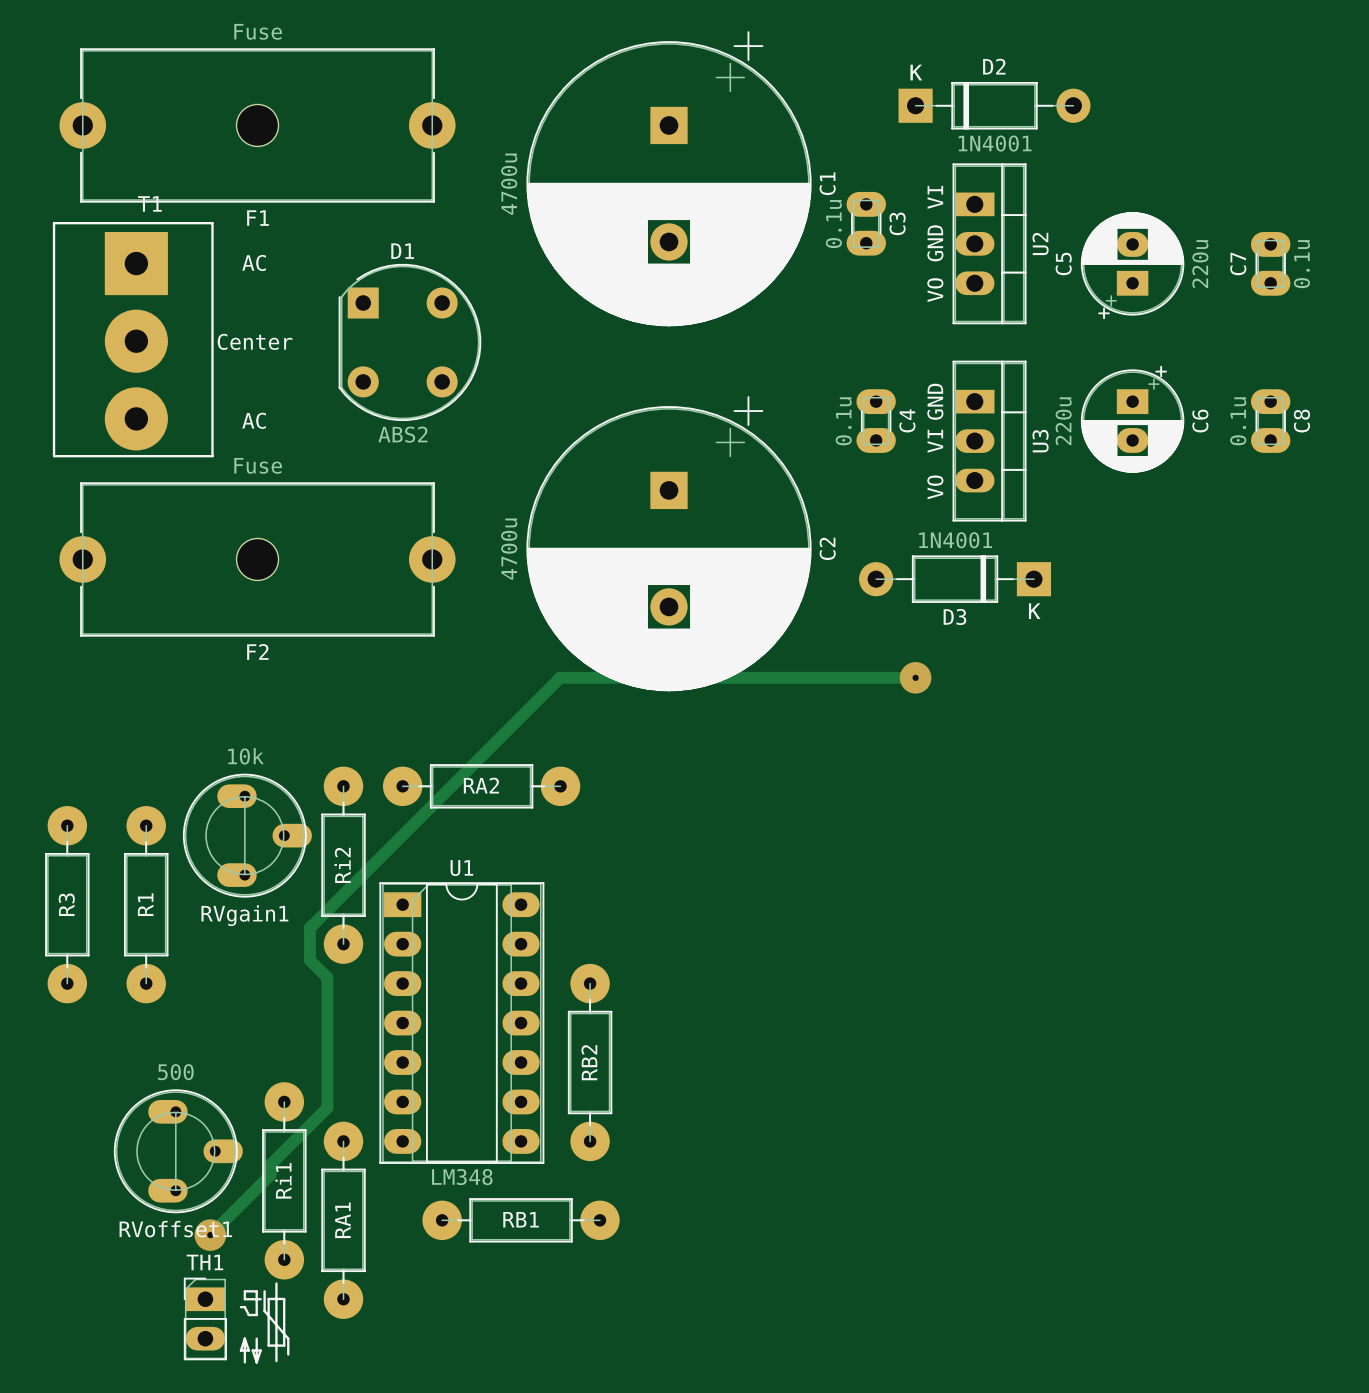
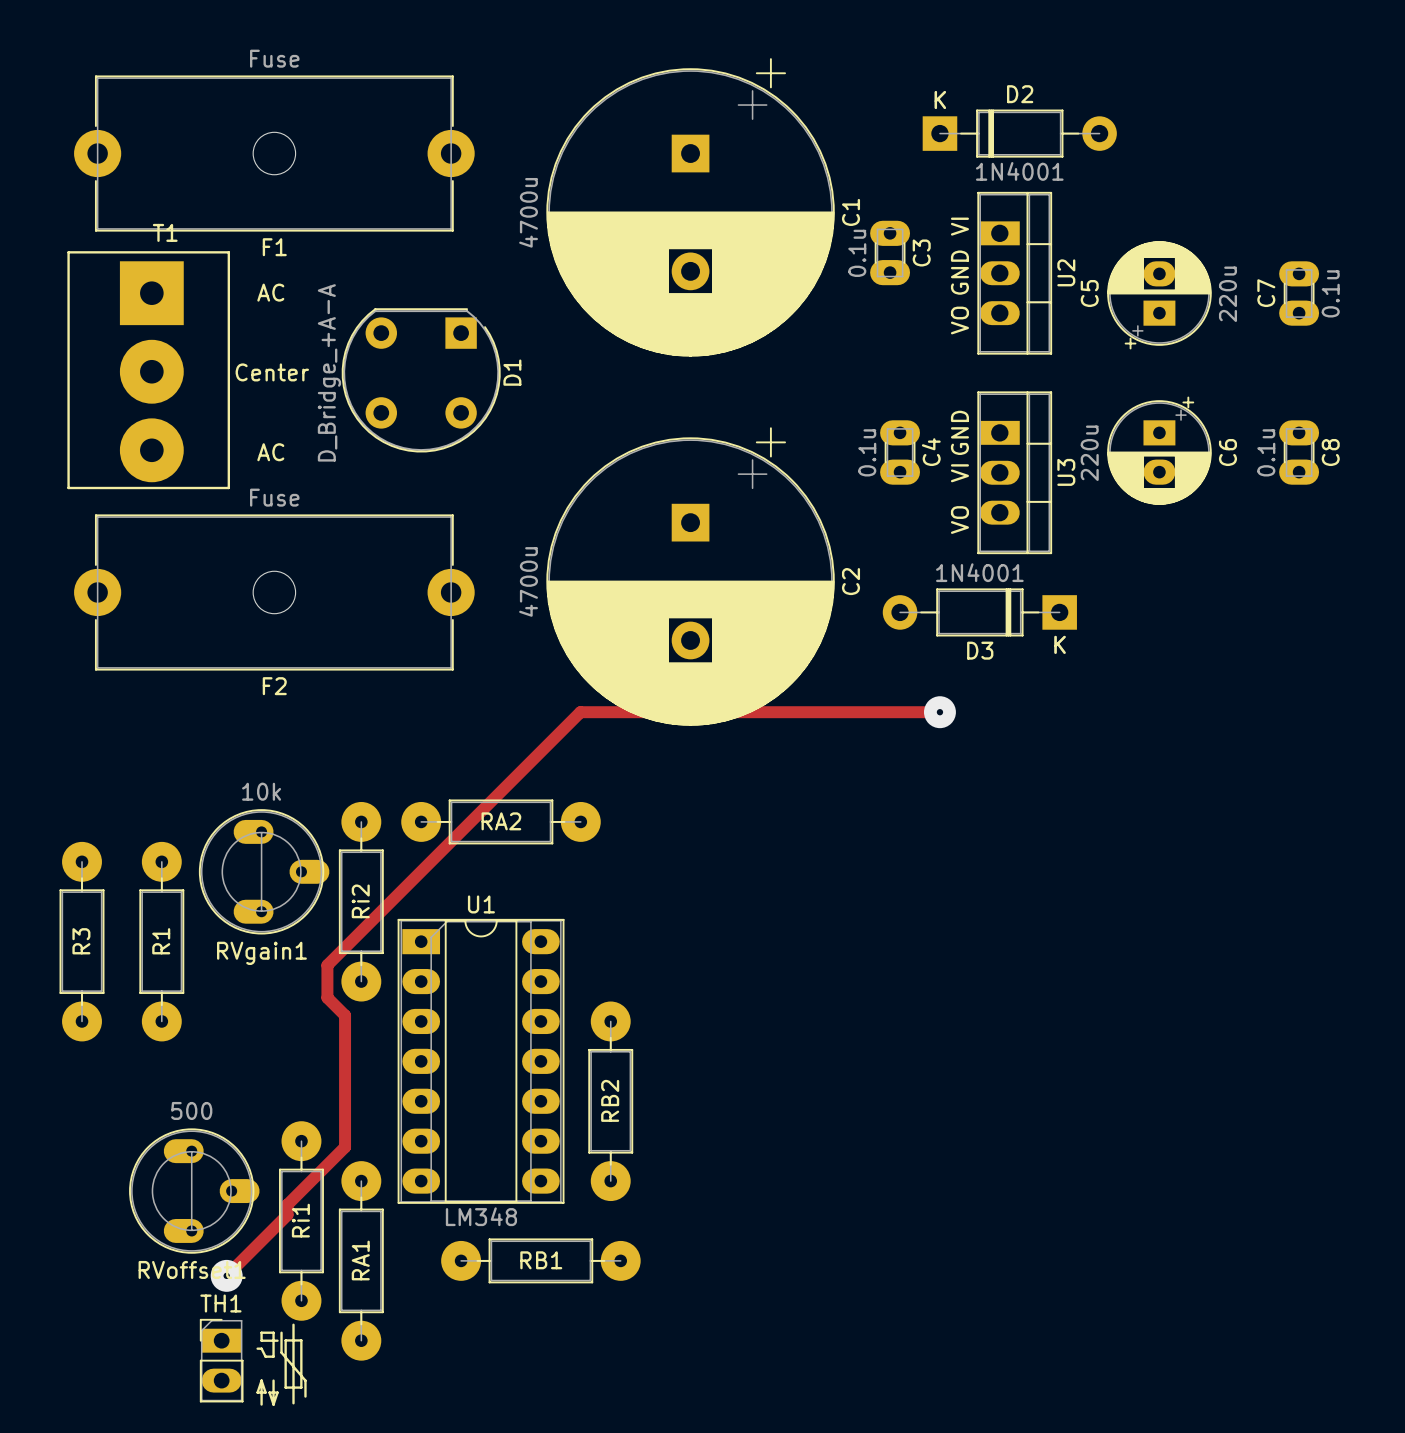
D1 rotation: 0° (409, 342) -> 90° clockwise (421, 380)
D1 value: ABS2 (402, 434) -> D_Bridge_+A-A (329, 372)

